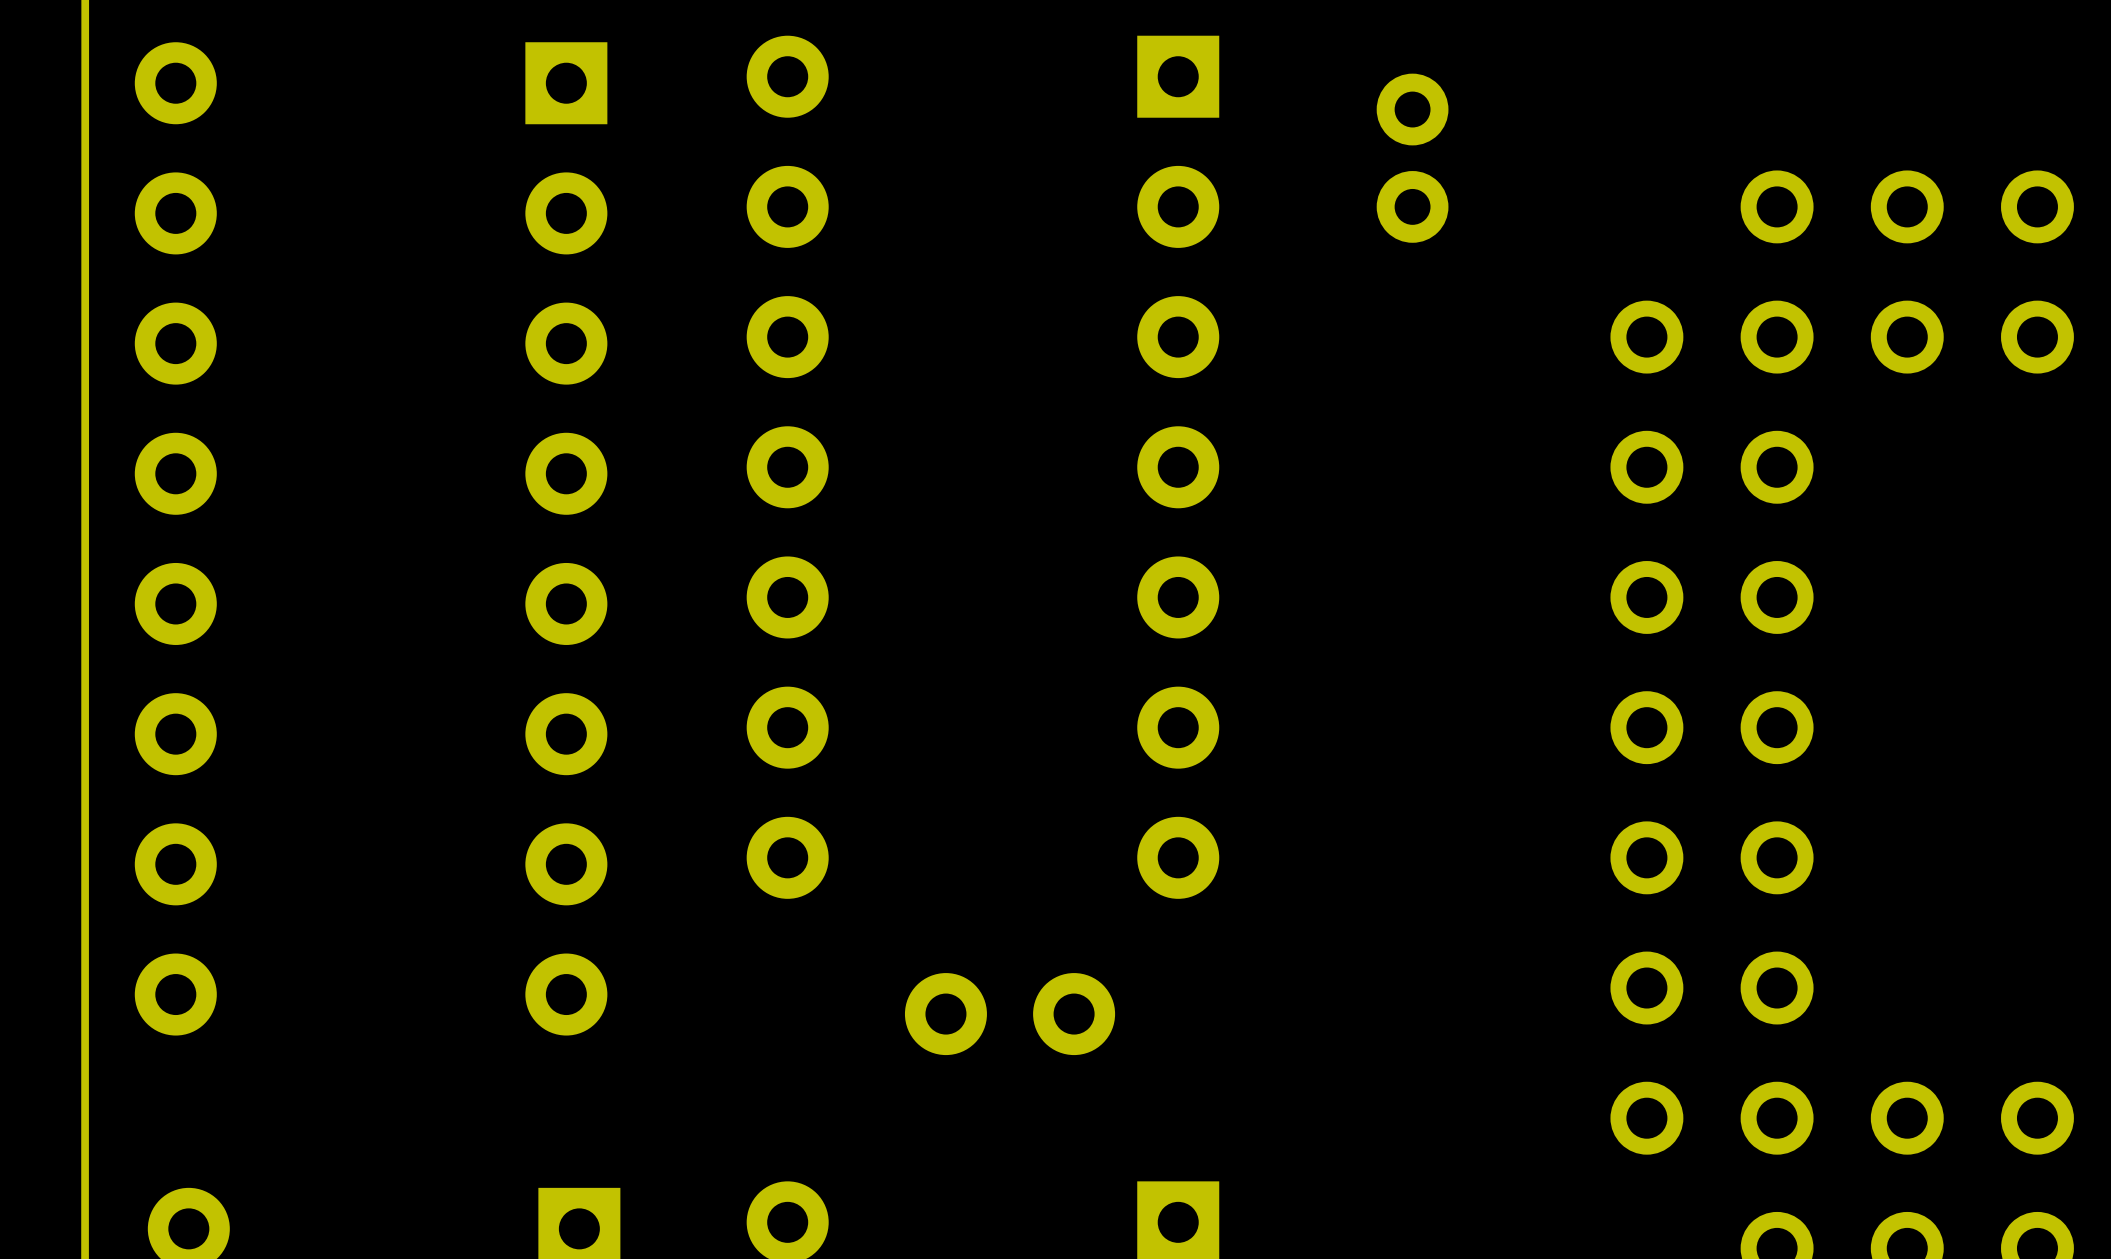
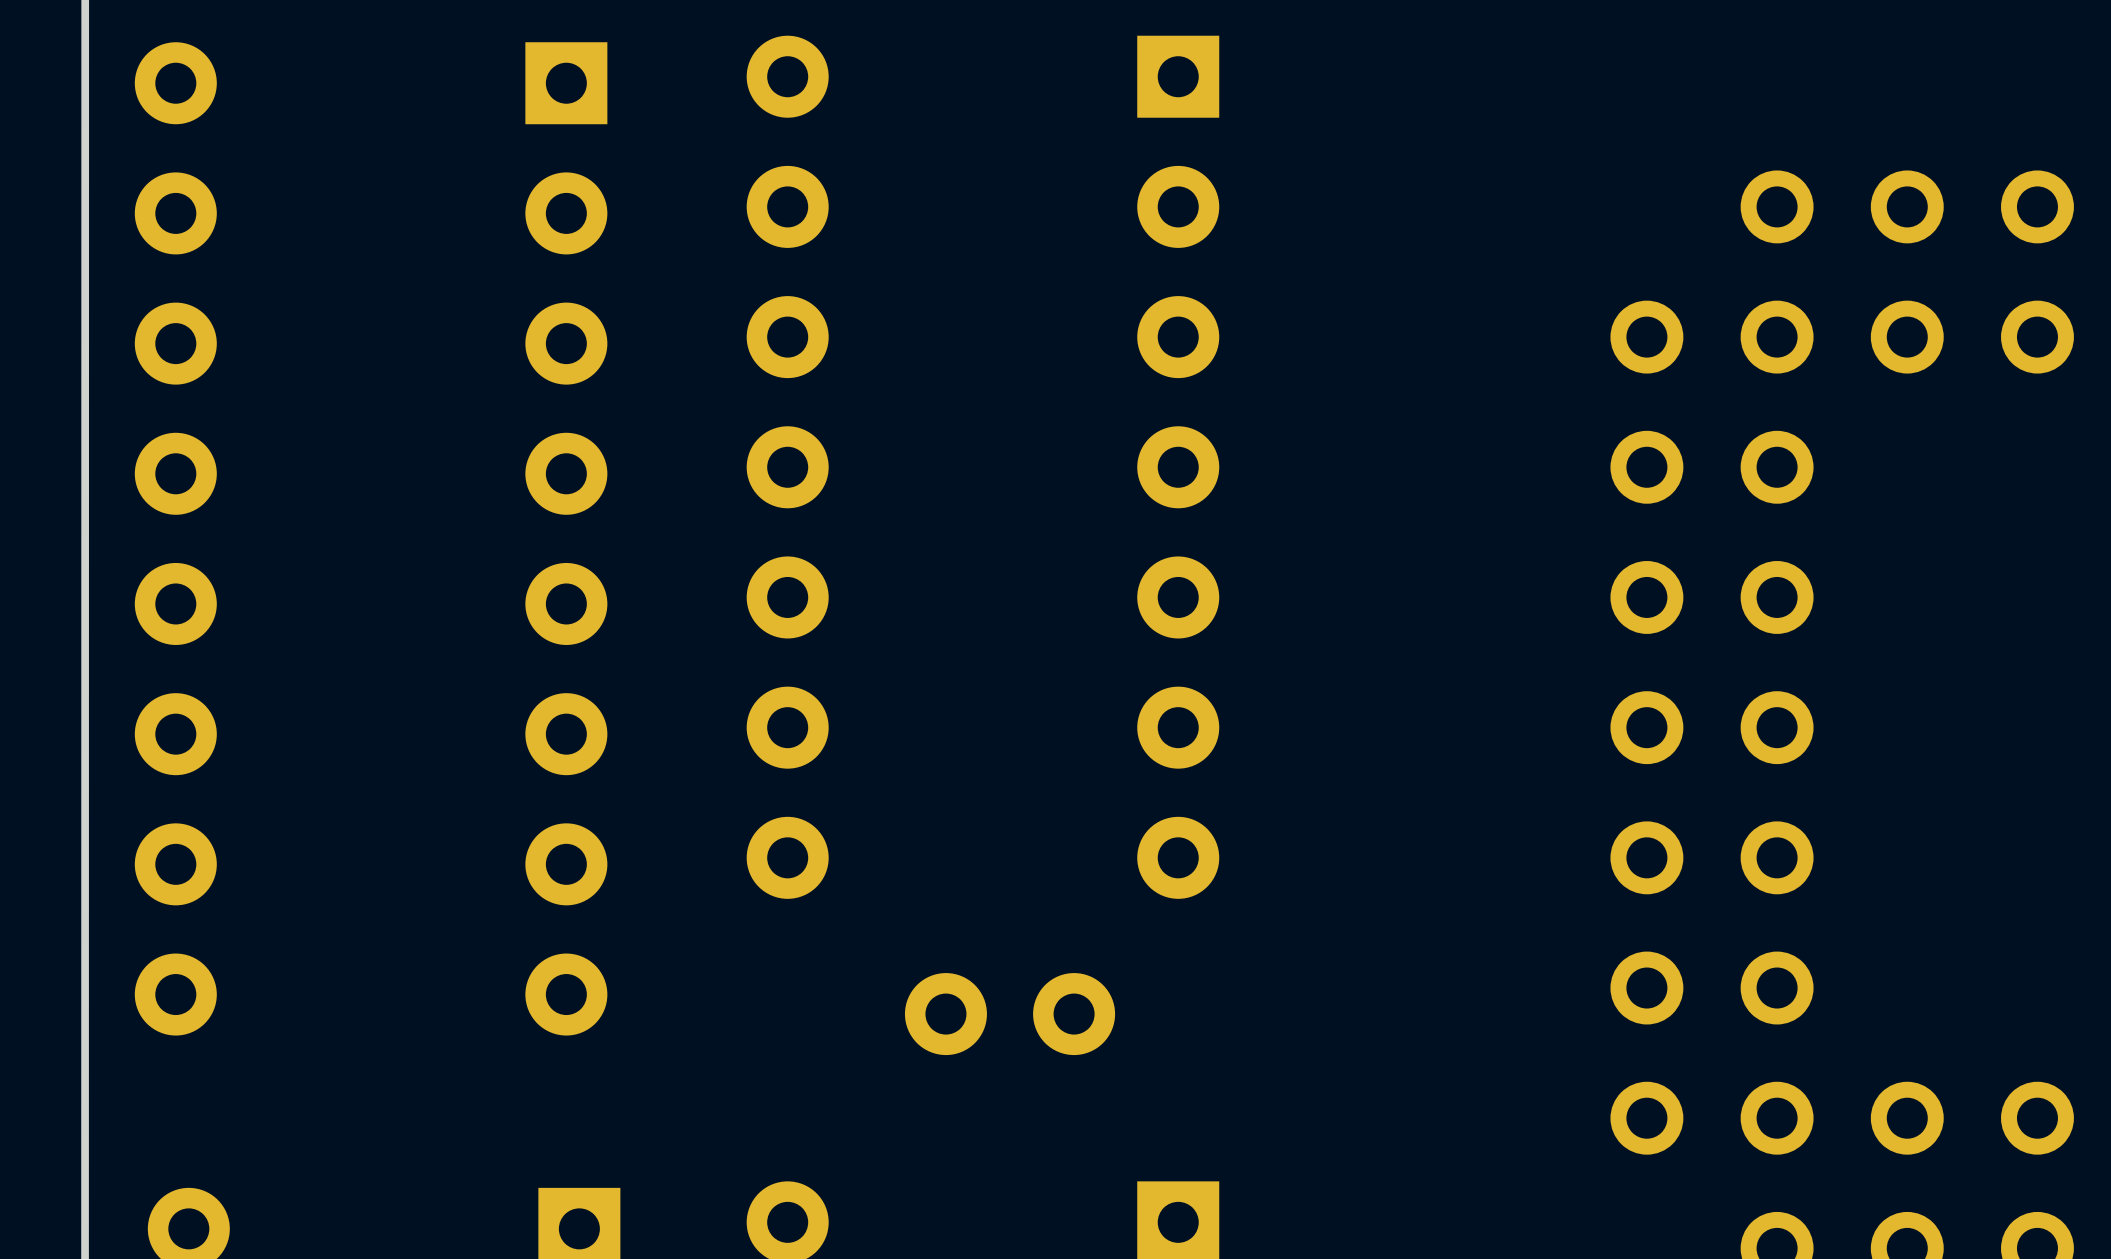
part: (1412, 158) -> none

